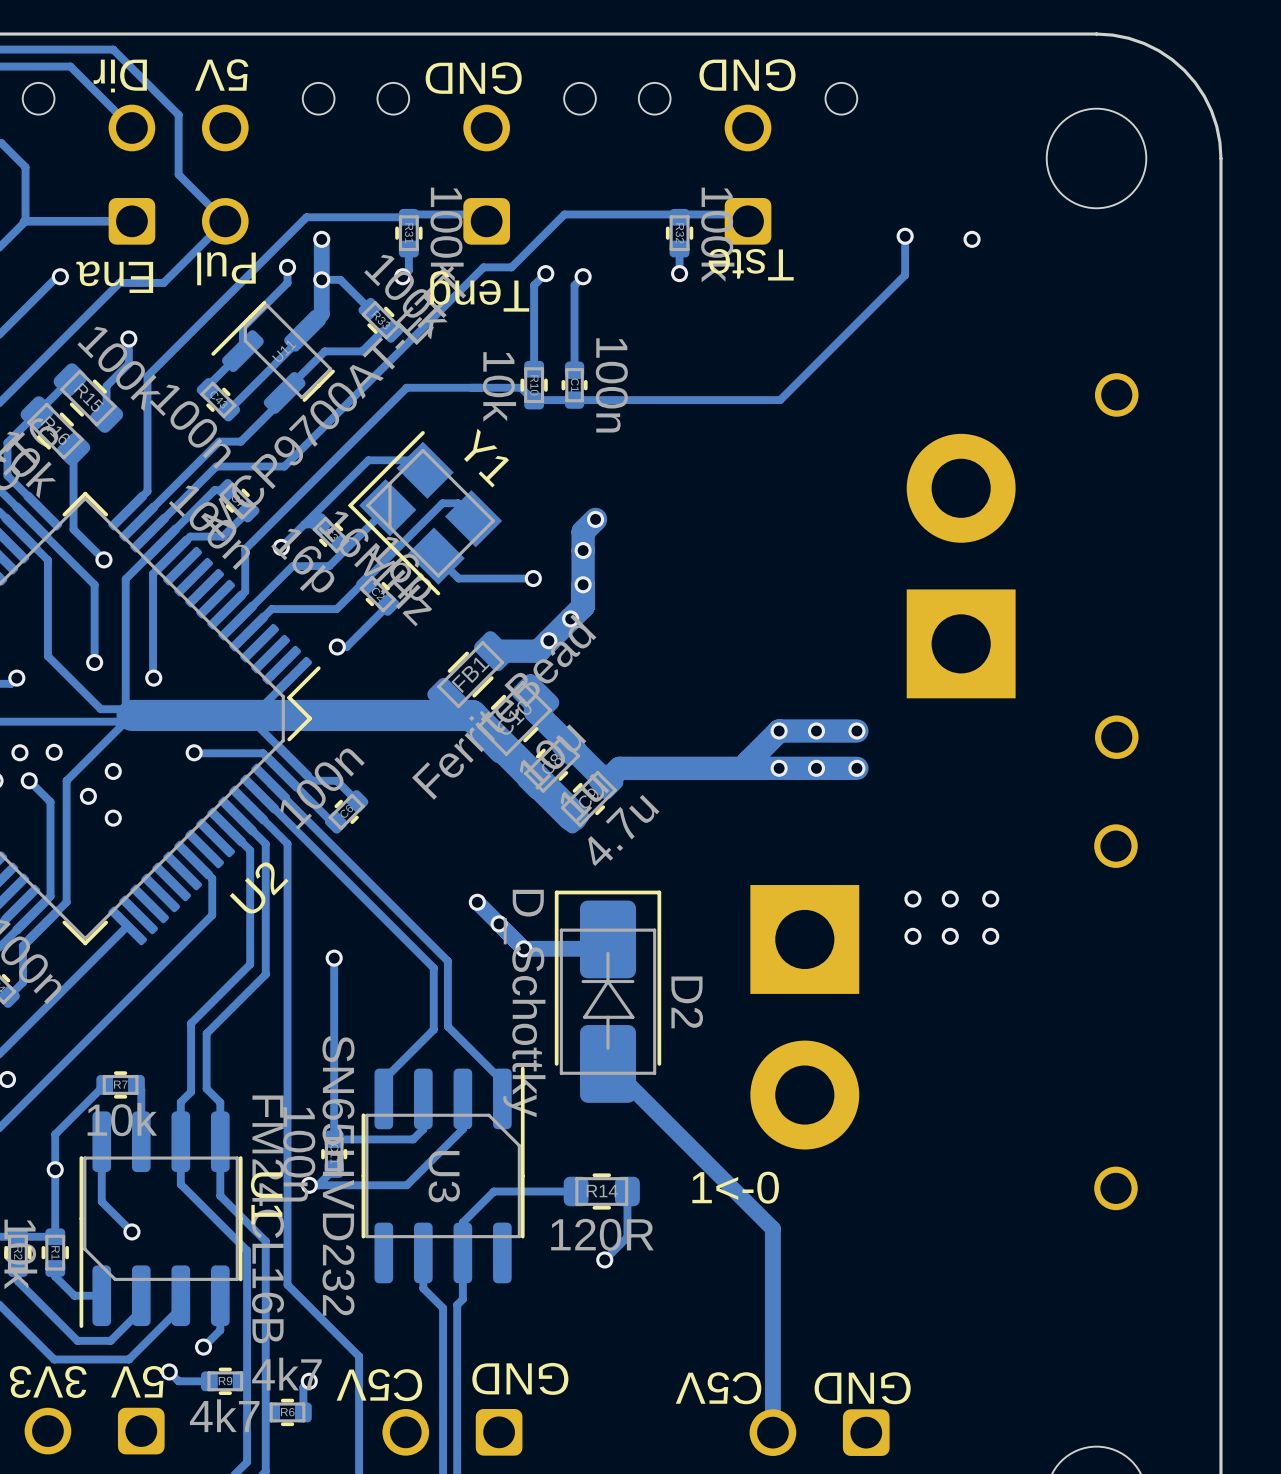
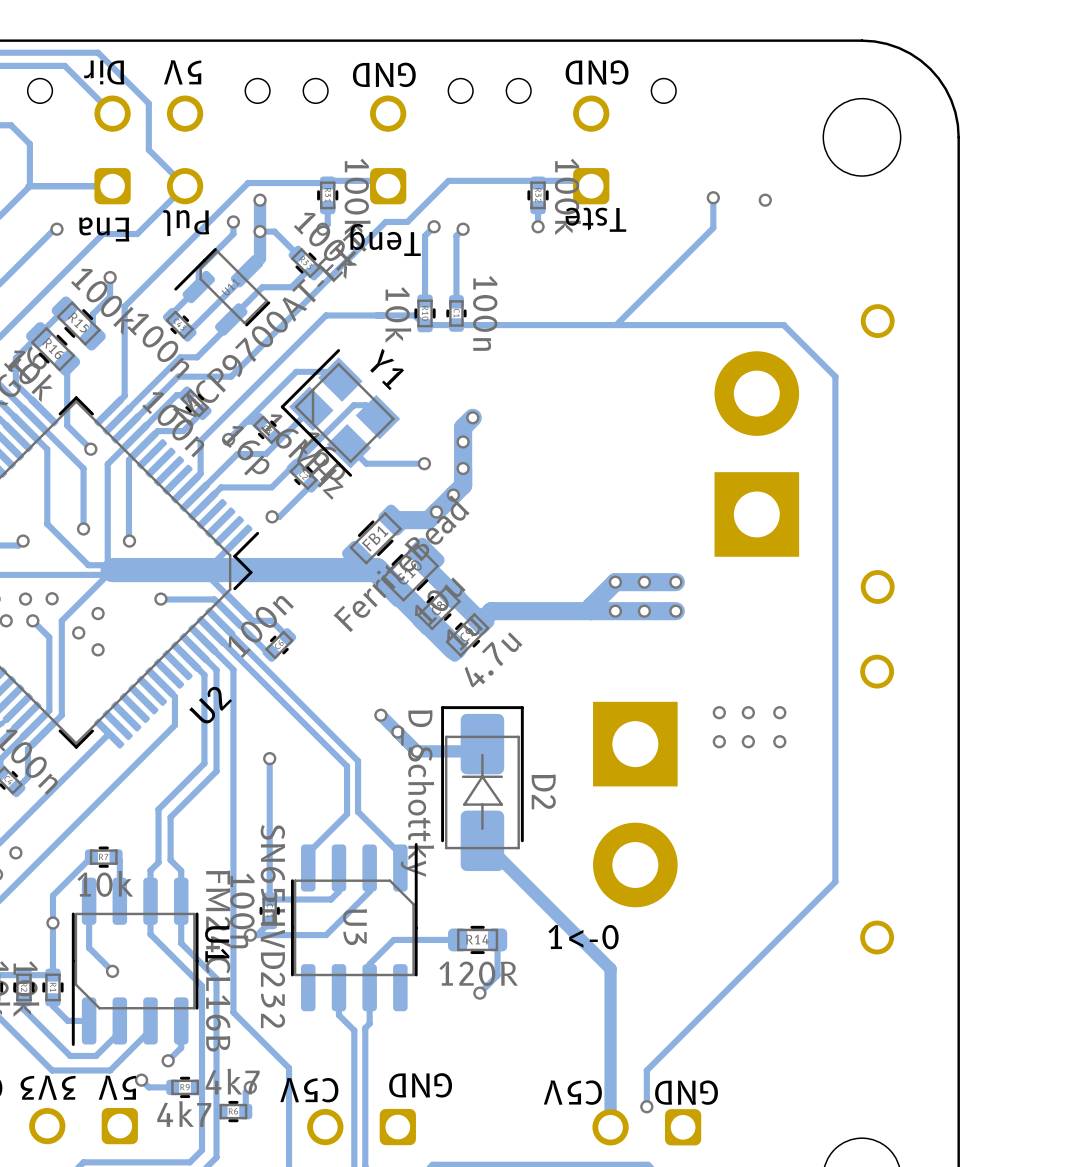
track: none -> (616, 325) (783, 325) (835, 376) (835, 881) (646, 1070) (646, 1106)
via: none -> (646, 1106)

